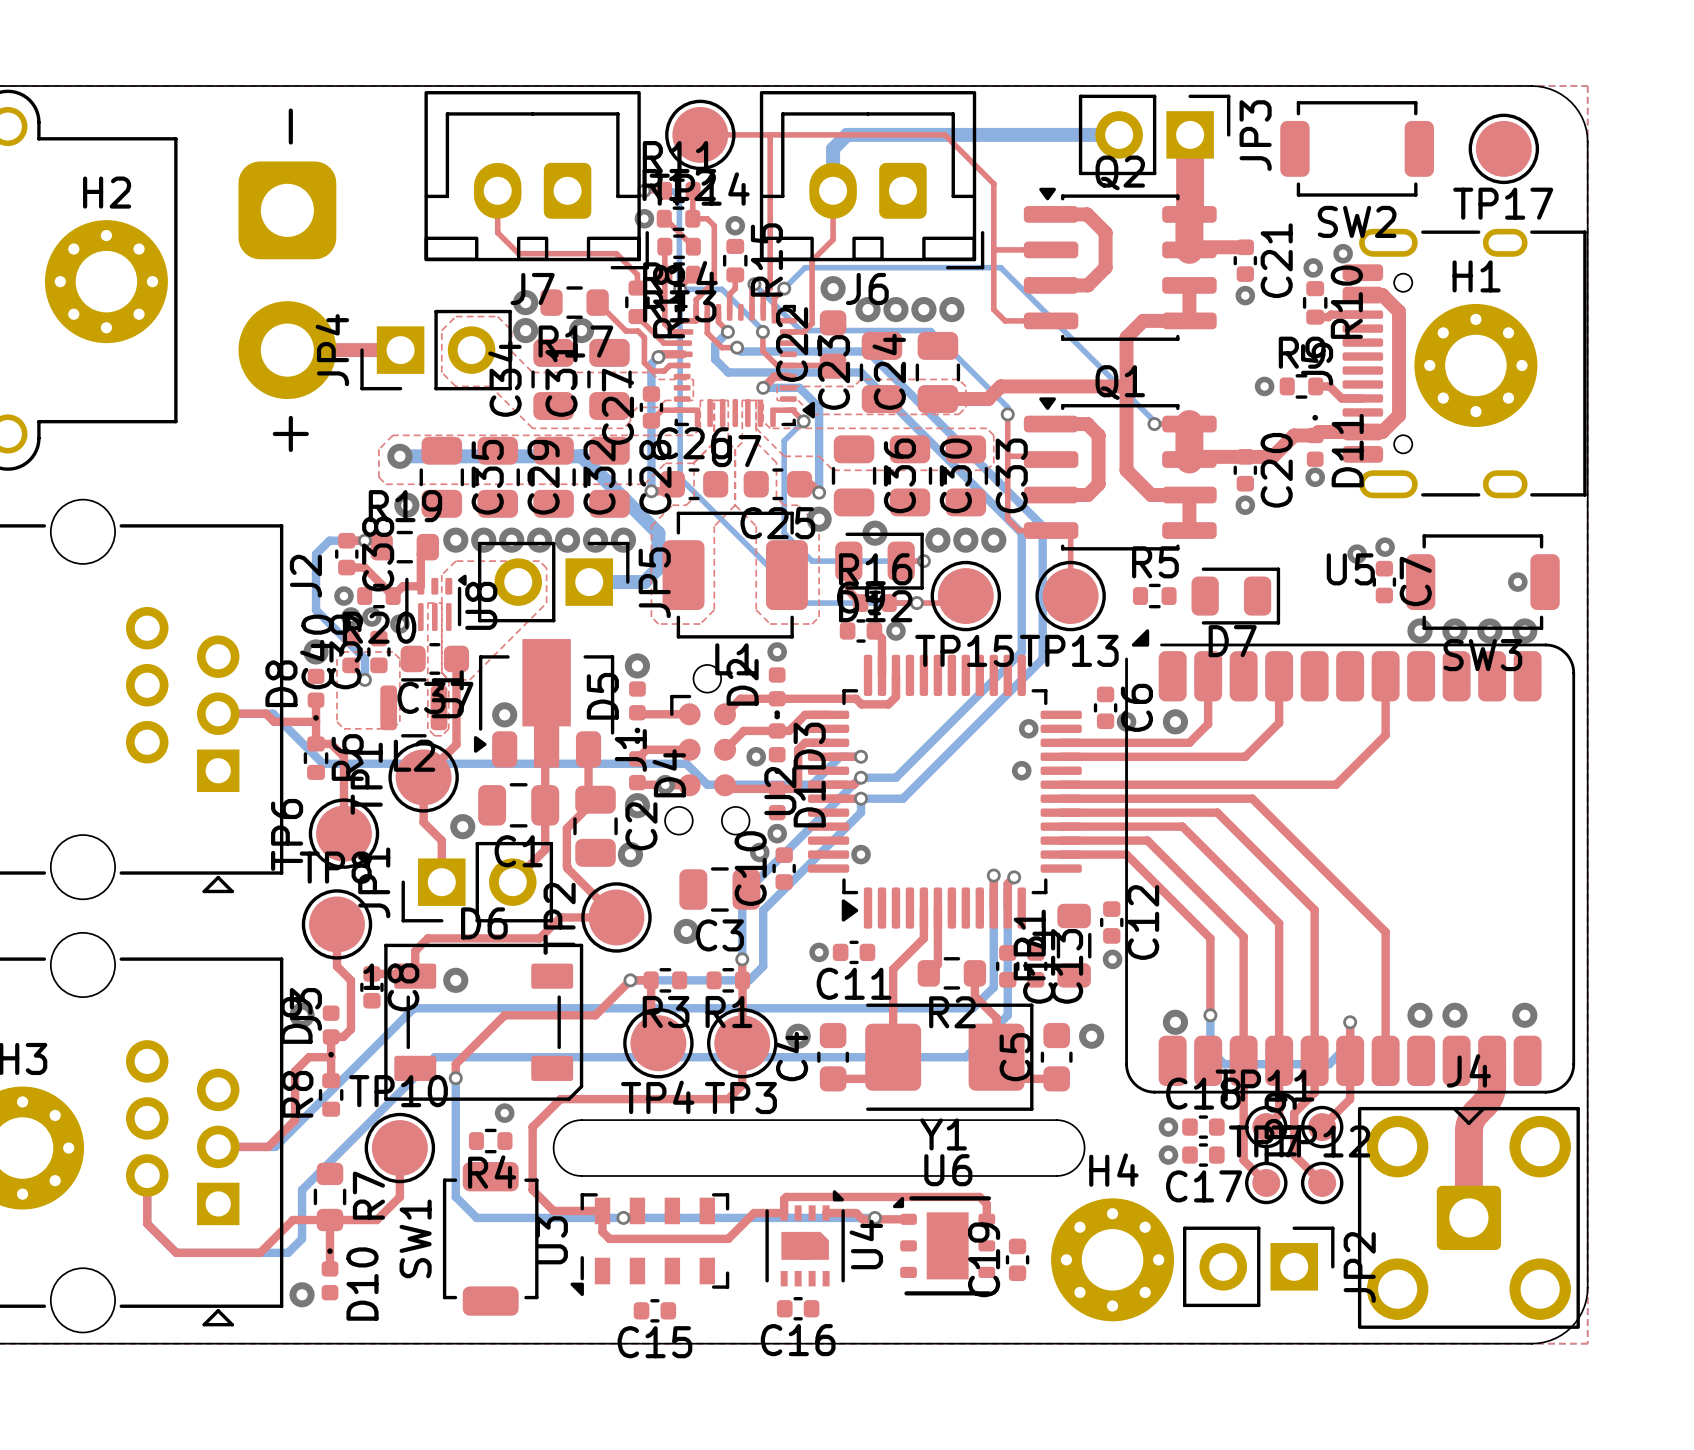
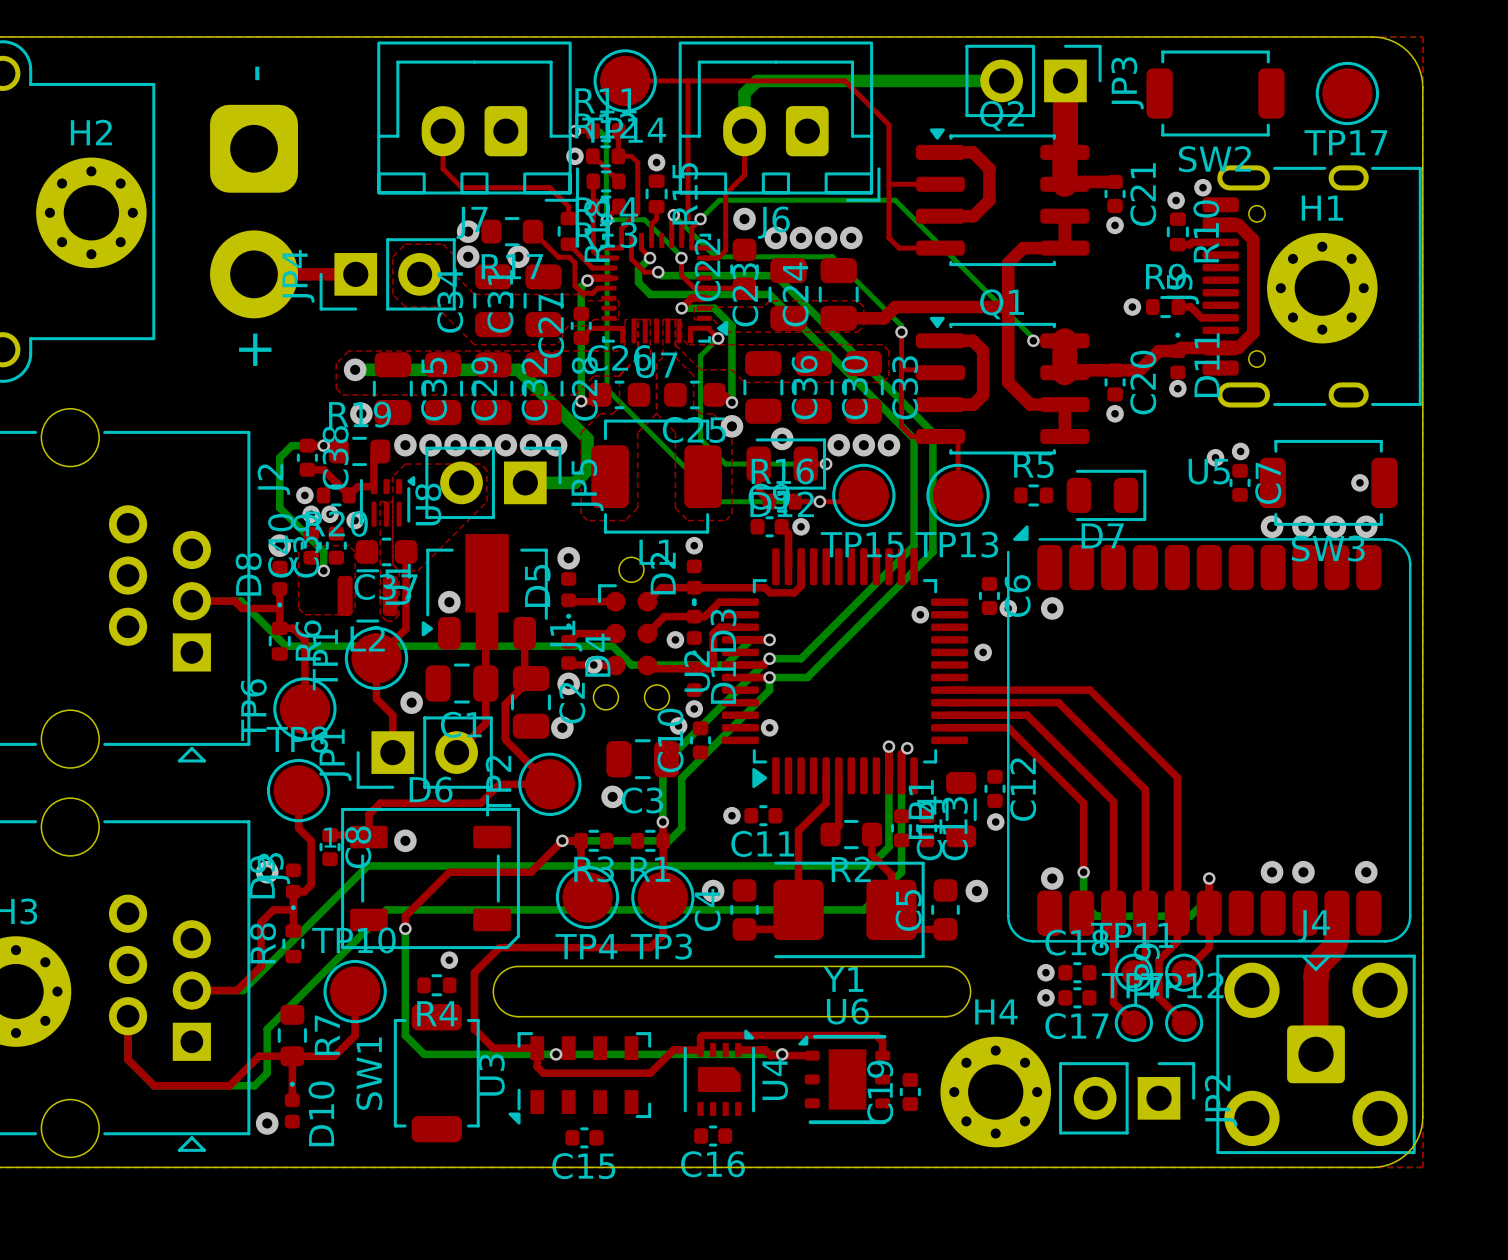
top track: (1208, 676) (1208, 724) (1189, 742) (1061, 742) -> none
top track: (1279, 676) (1279, 722) (1245, 756) (1061, 756) -> none
top track: (1385, 676) (1385, 735) (1336, 784) (1061, 784) -> none
via position: (1021, 770) -> (983, 652)
top track: (1061, 798) (1252, 798) (1385, 932) (1385, 1060) -> none

